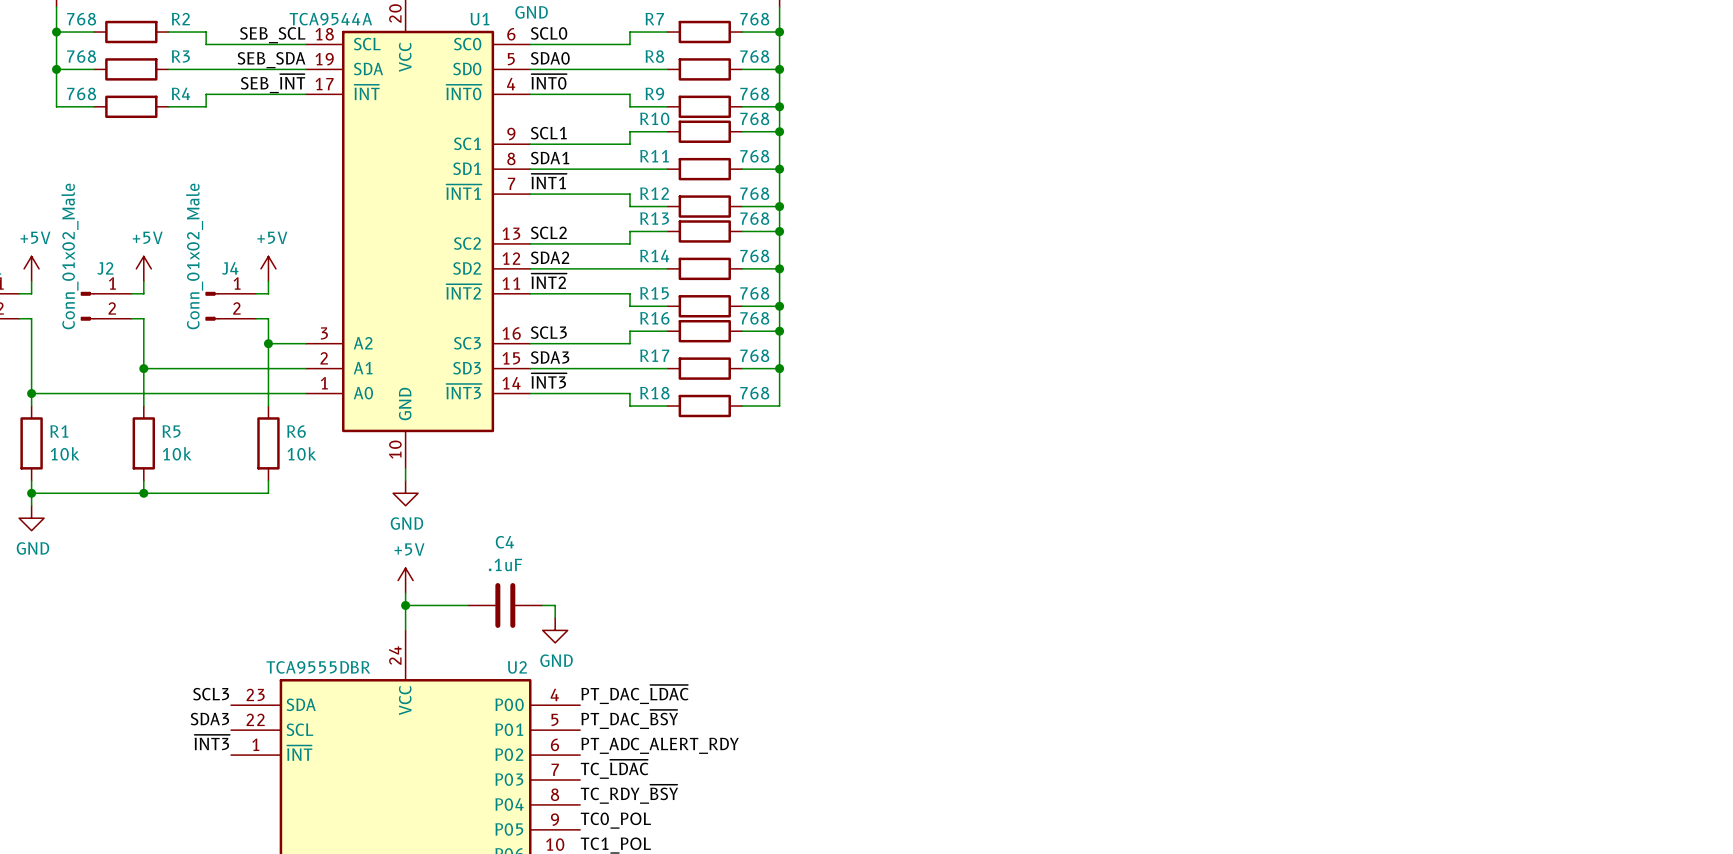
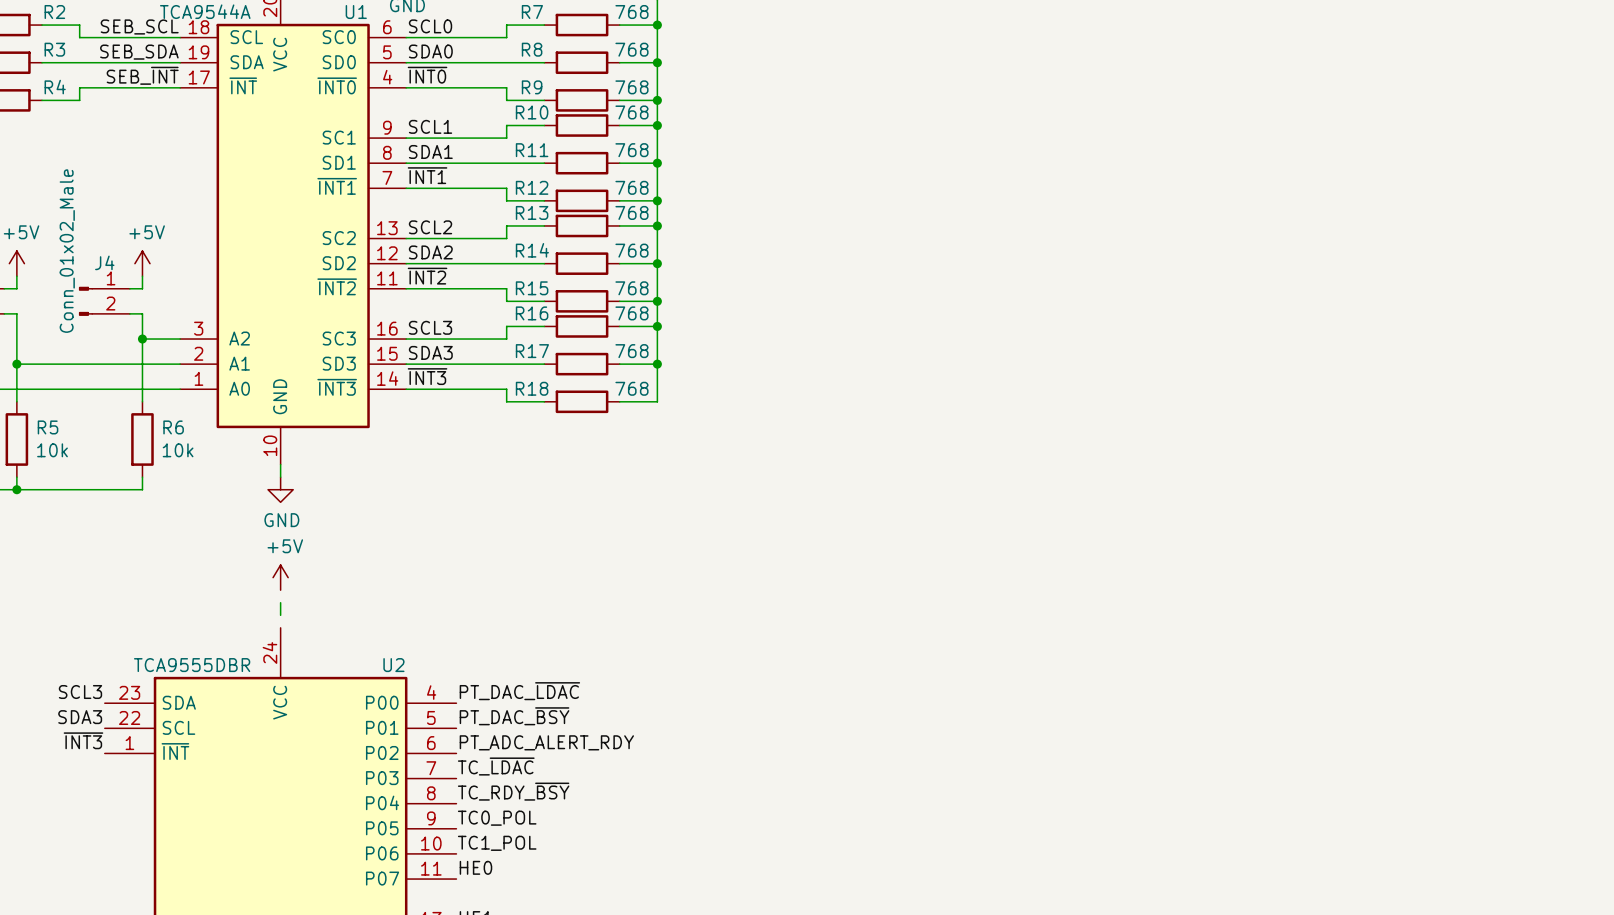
wire: (405, 593) (405, 605) (467, 605) -> none
junction: (405, 605) -> none
C4: .1uF (505, 605) -> none
wire: (542, 605) (555, 605) (555, 617) -> none
wire: (405, 617) (405, 630) -> none
power symbol: GND (555, 630) -> none

